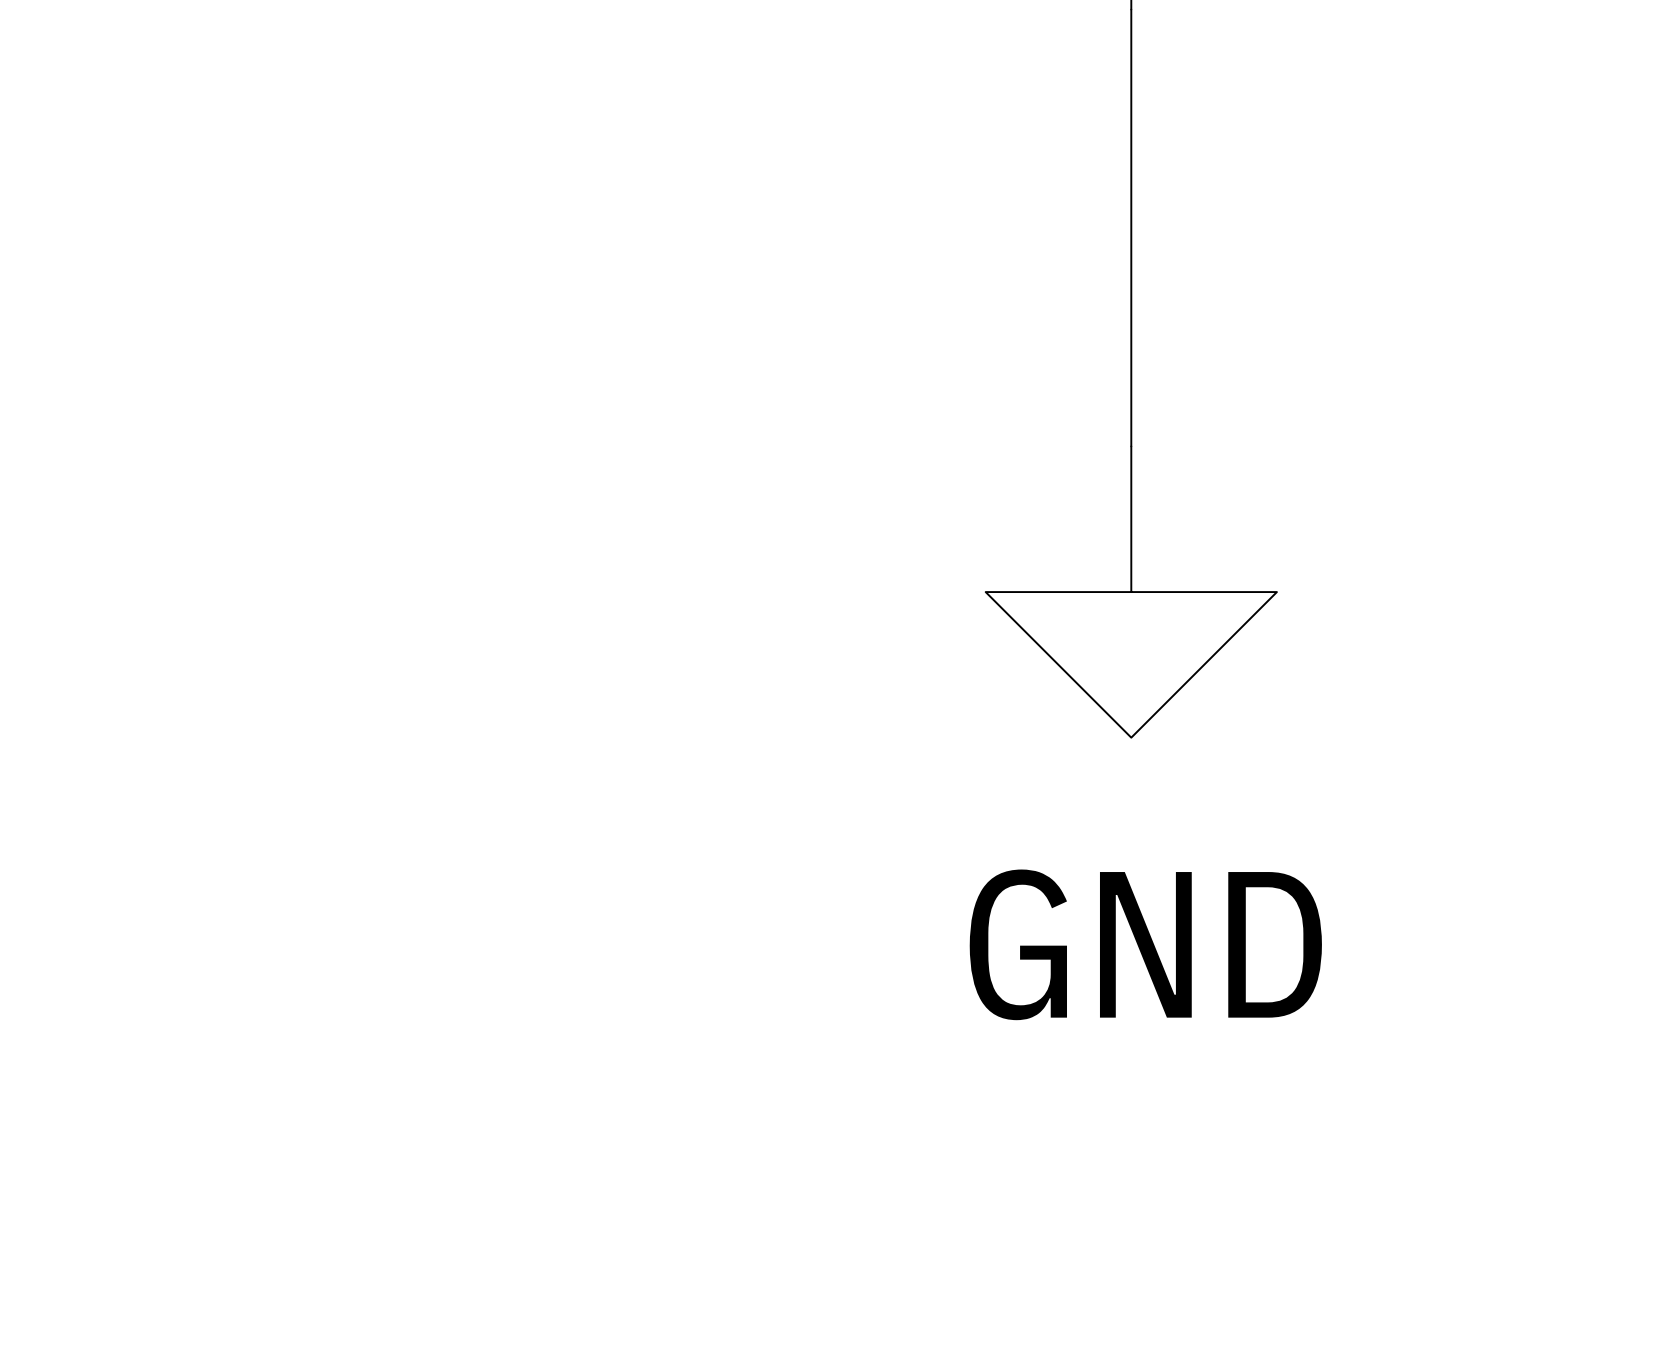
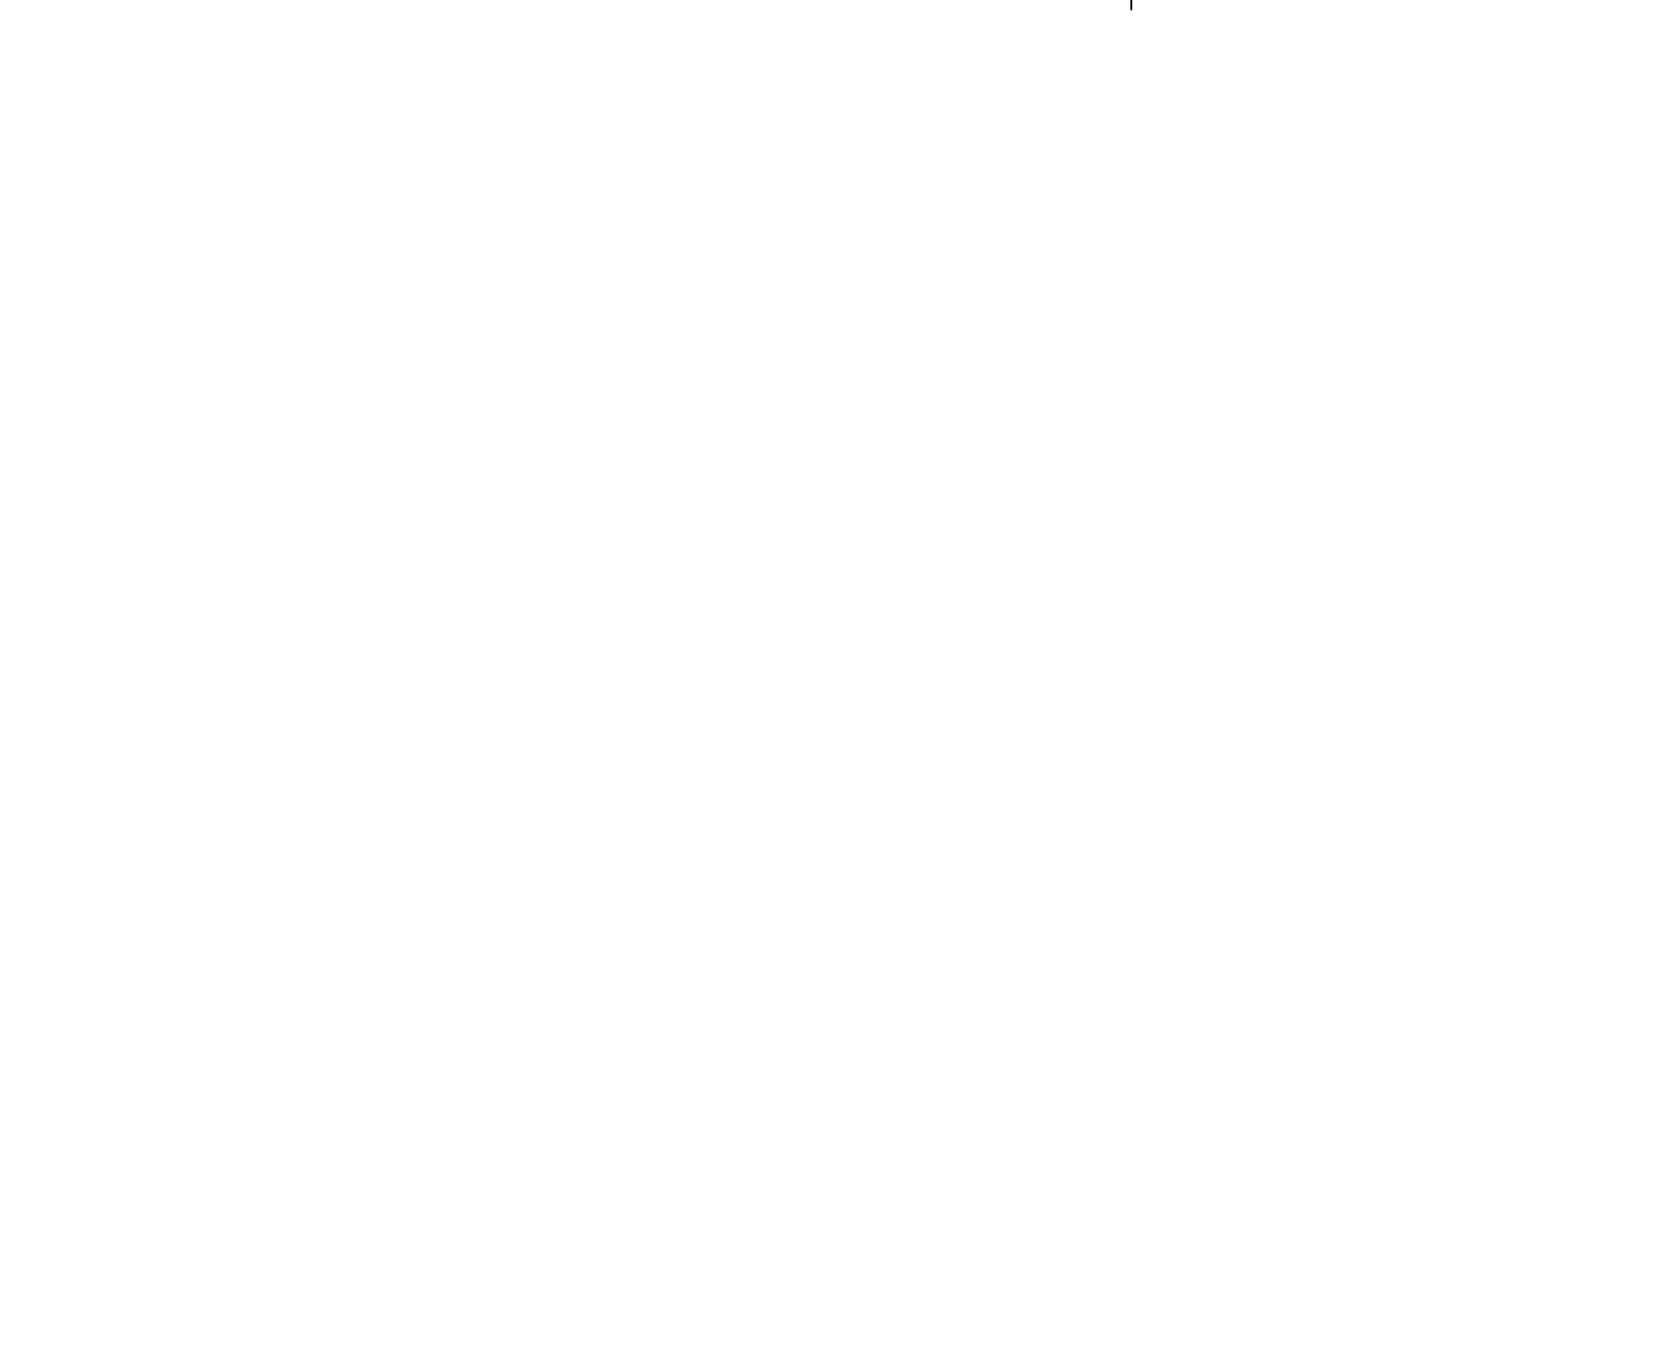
wire: (1131, 9) (1131, 446) -> none
power symbol: GND (1131, 592) -> none

